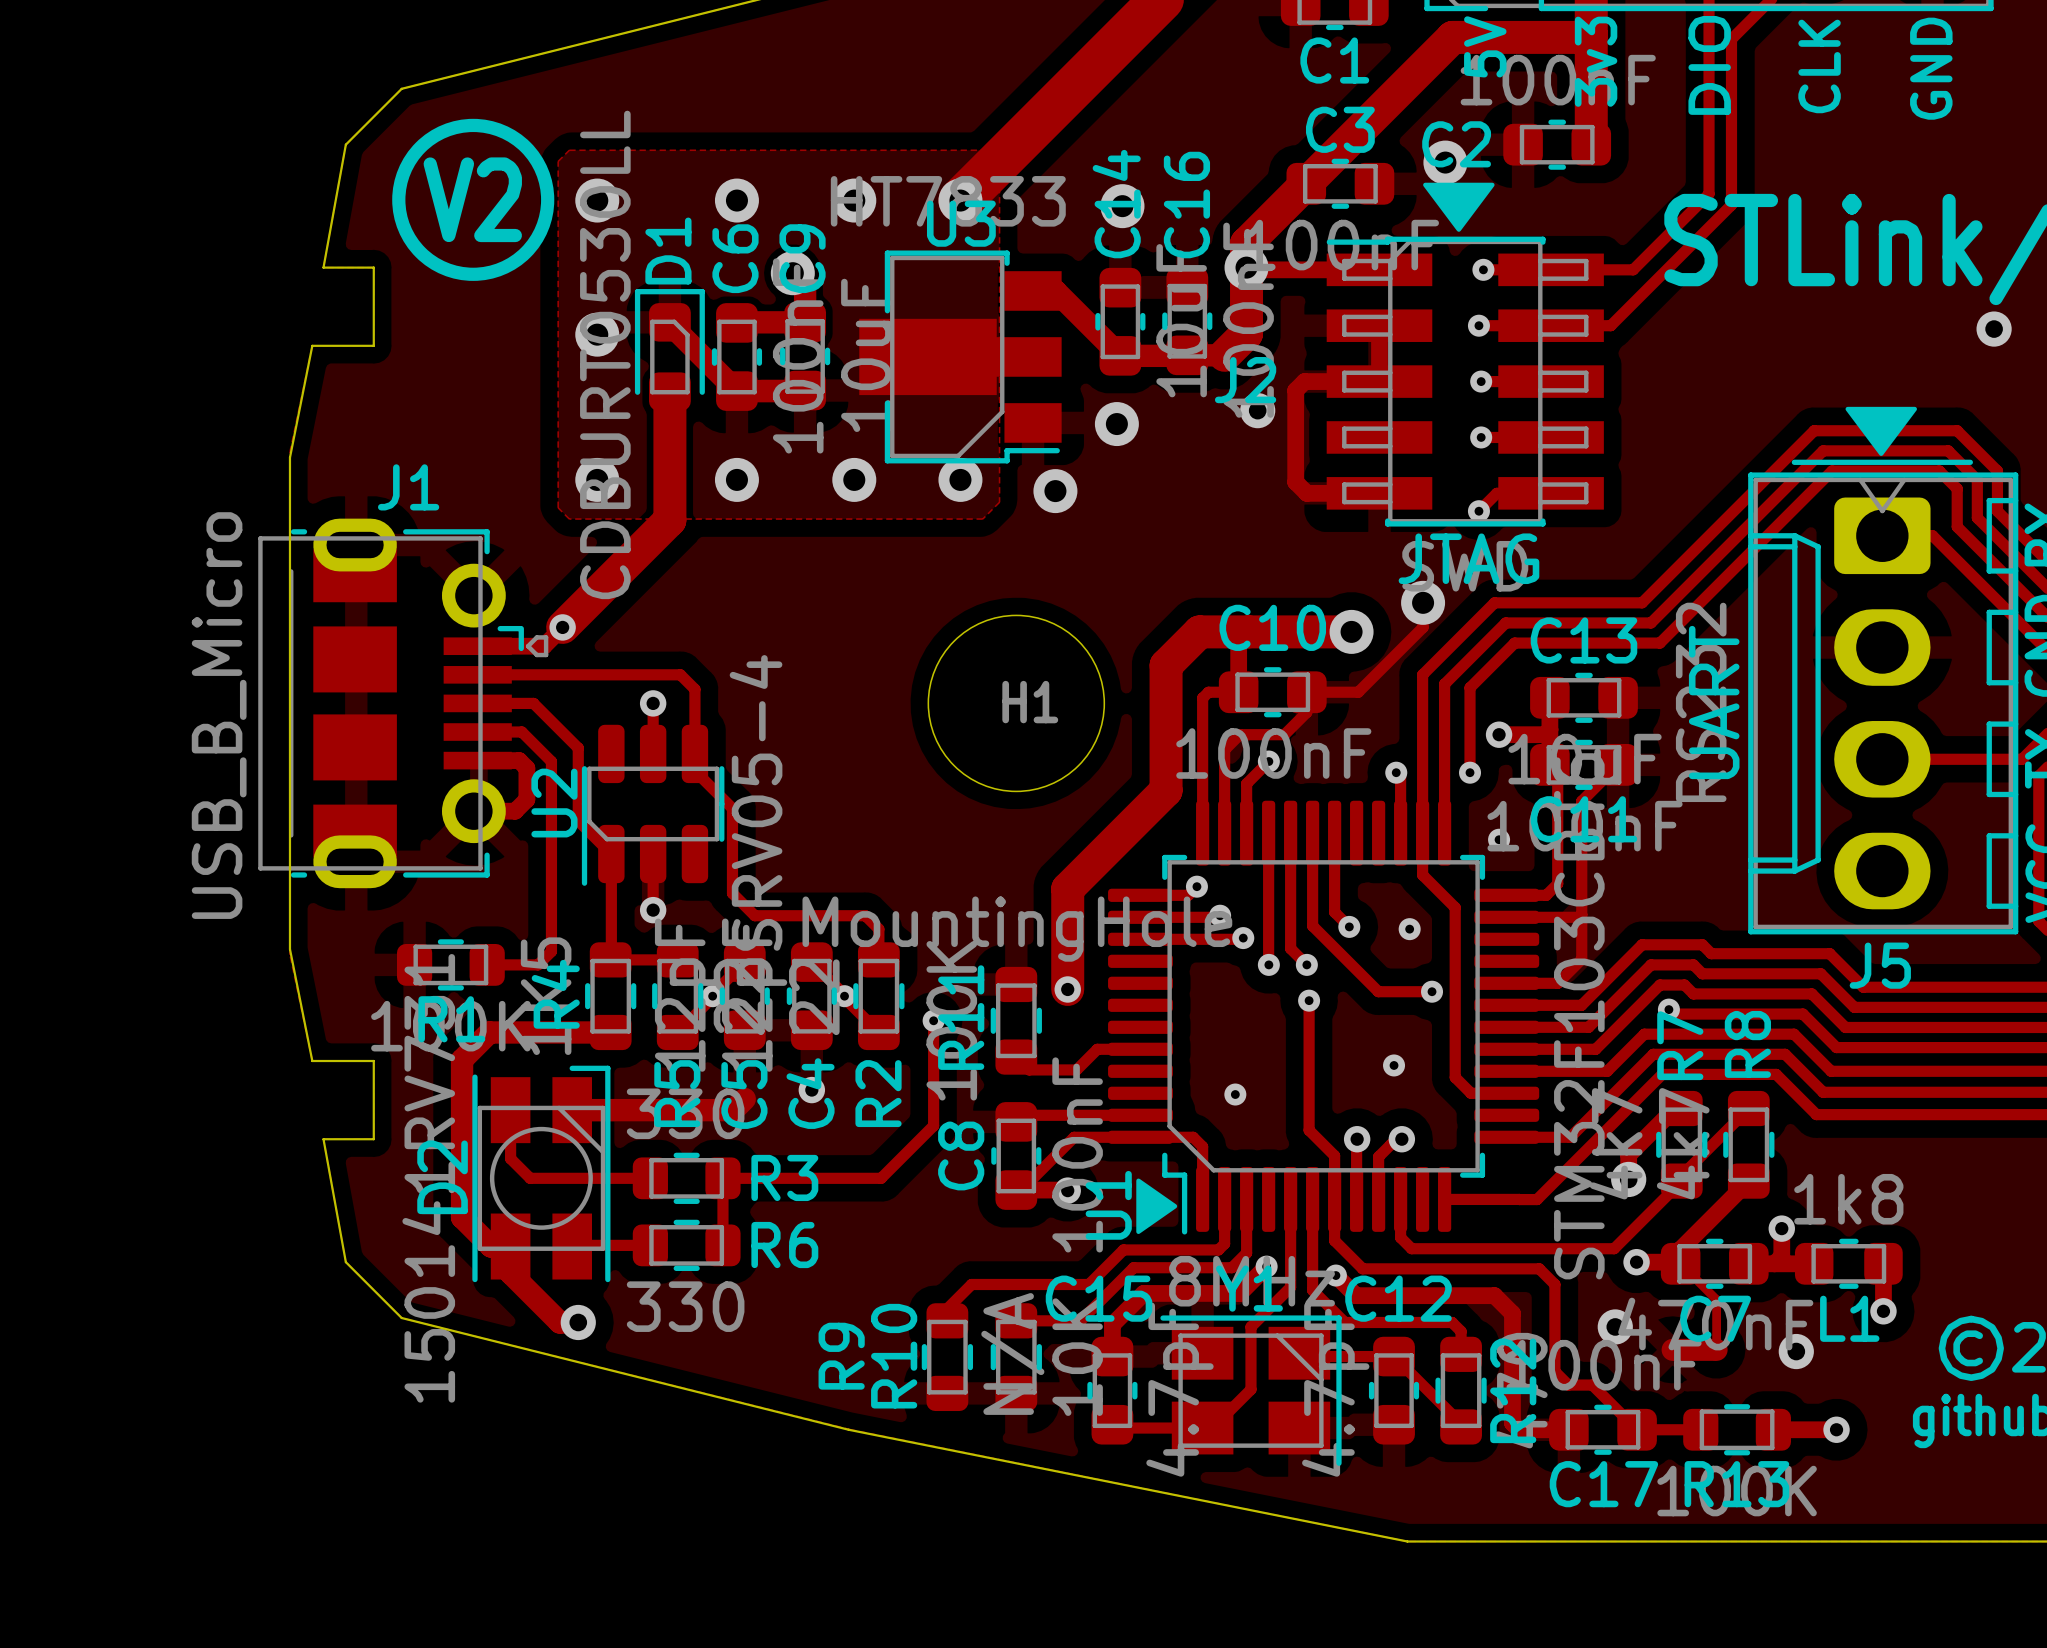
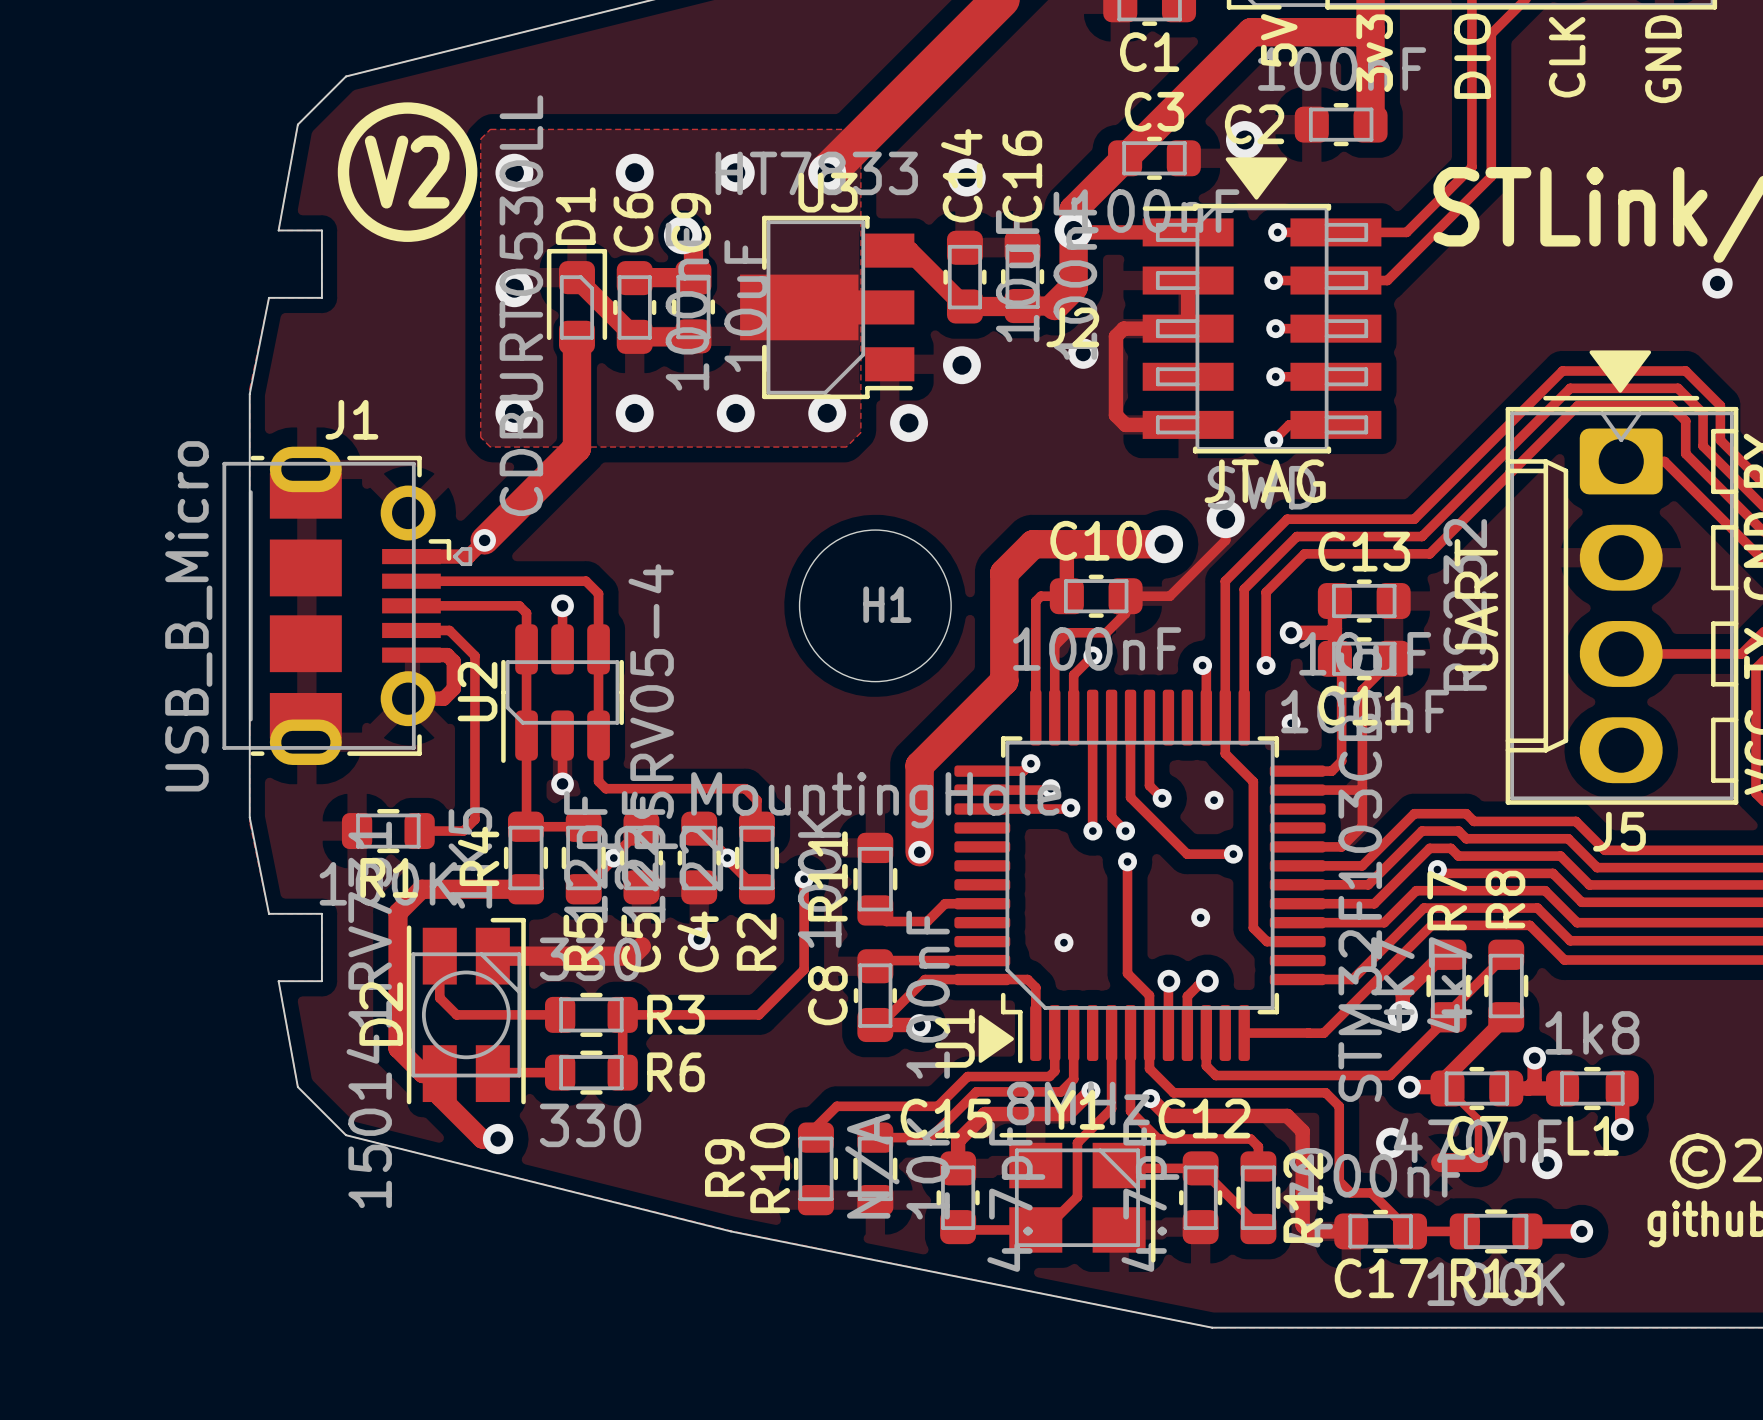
track: (533, 703) (578, 748) (578, 820) (611, 854) -> (459, 605) (519, 605) (526, 613) (526, 735)
track: (694, 770) (732, 808) (732, 893) (754, 915) -> (598, 663) (598, 781) (605, 788) (650, 788)

